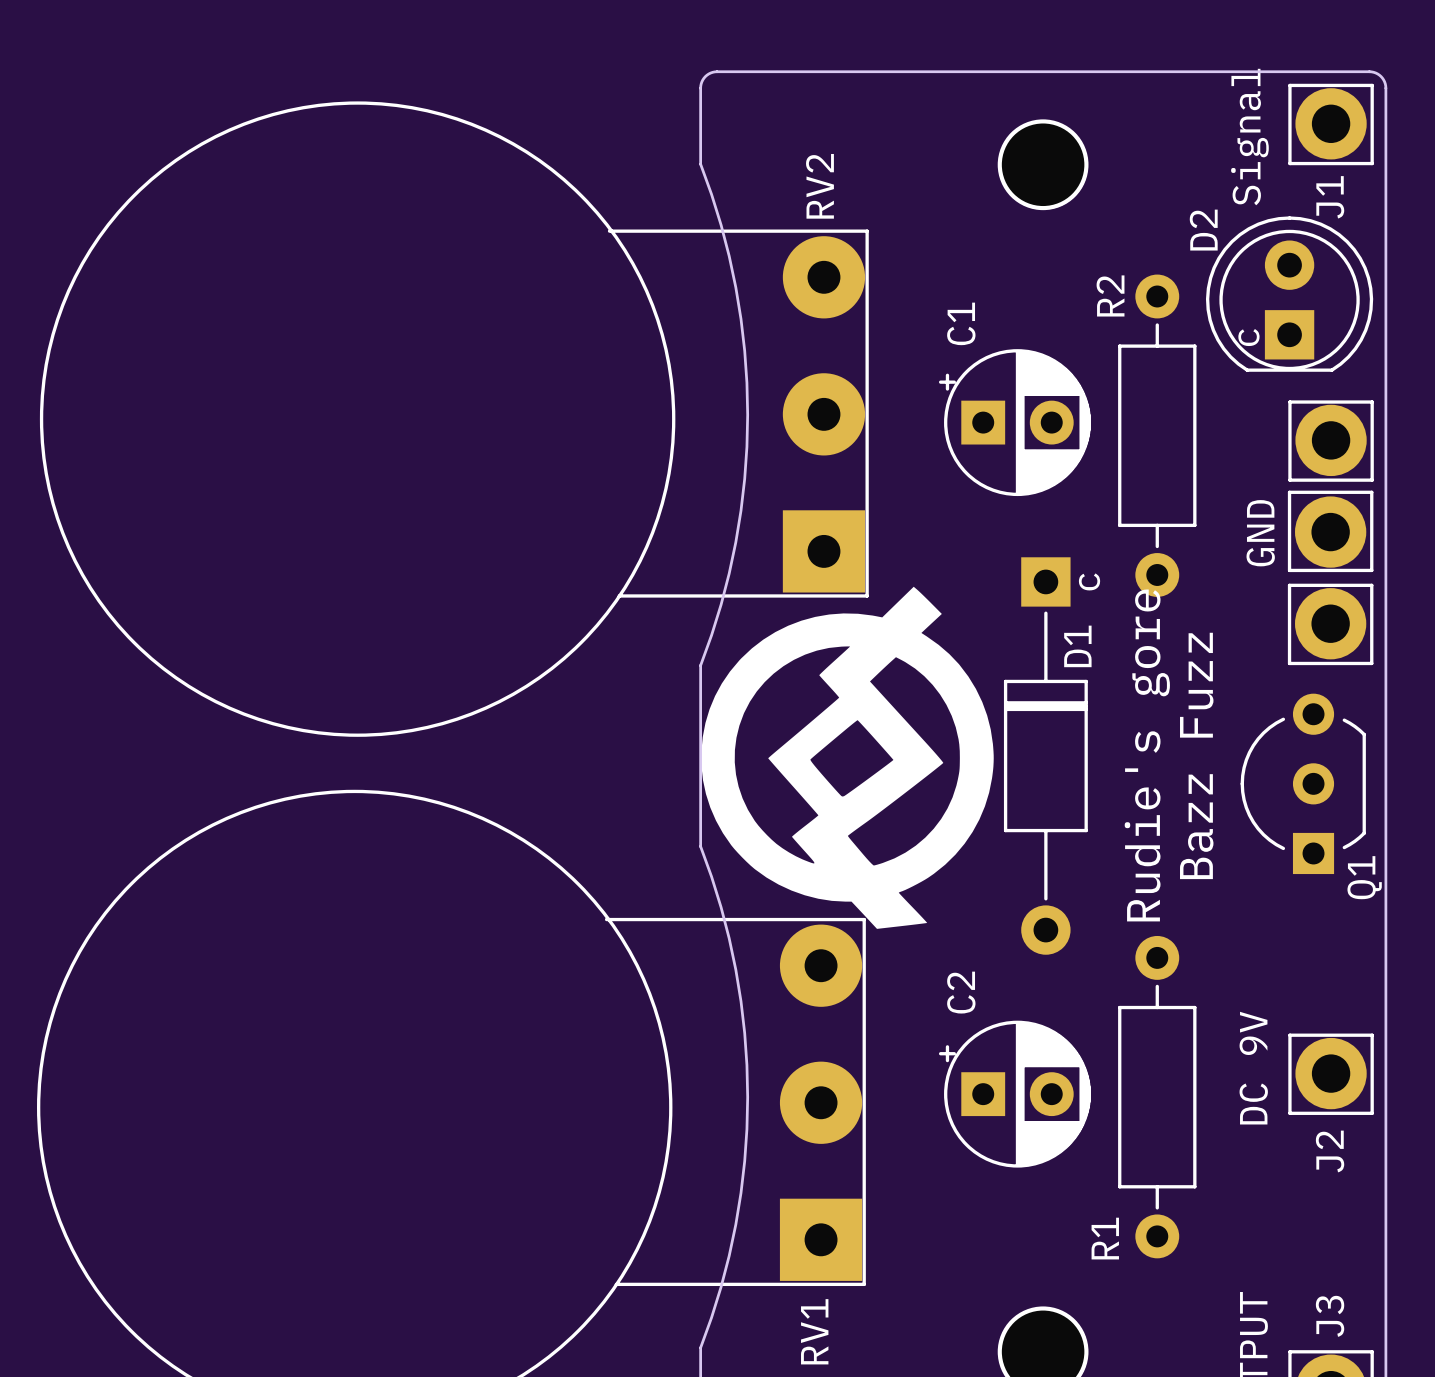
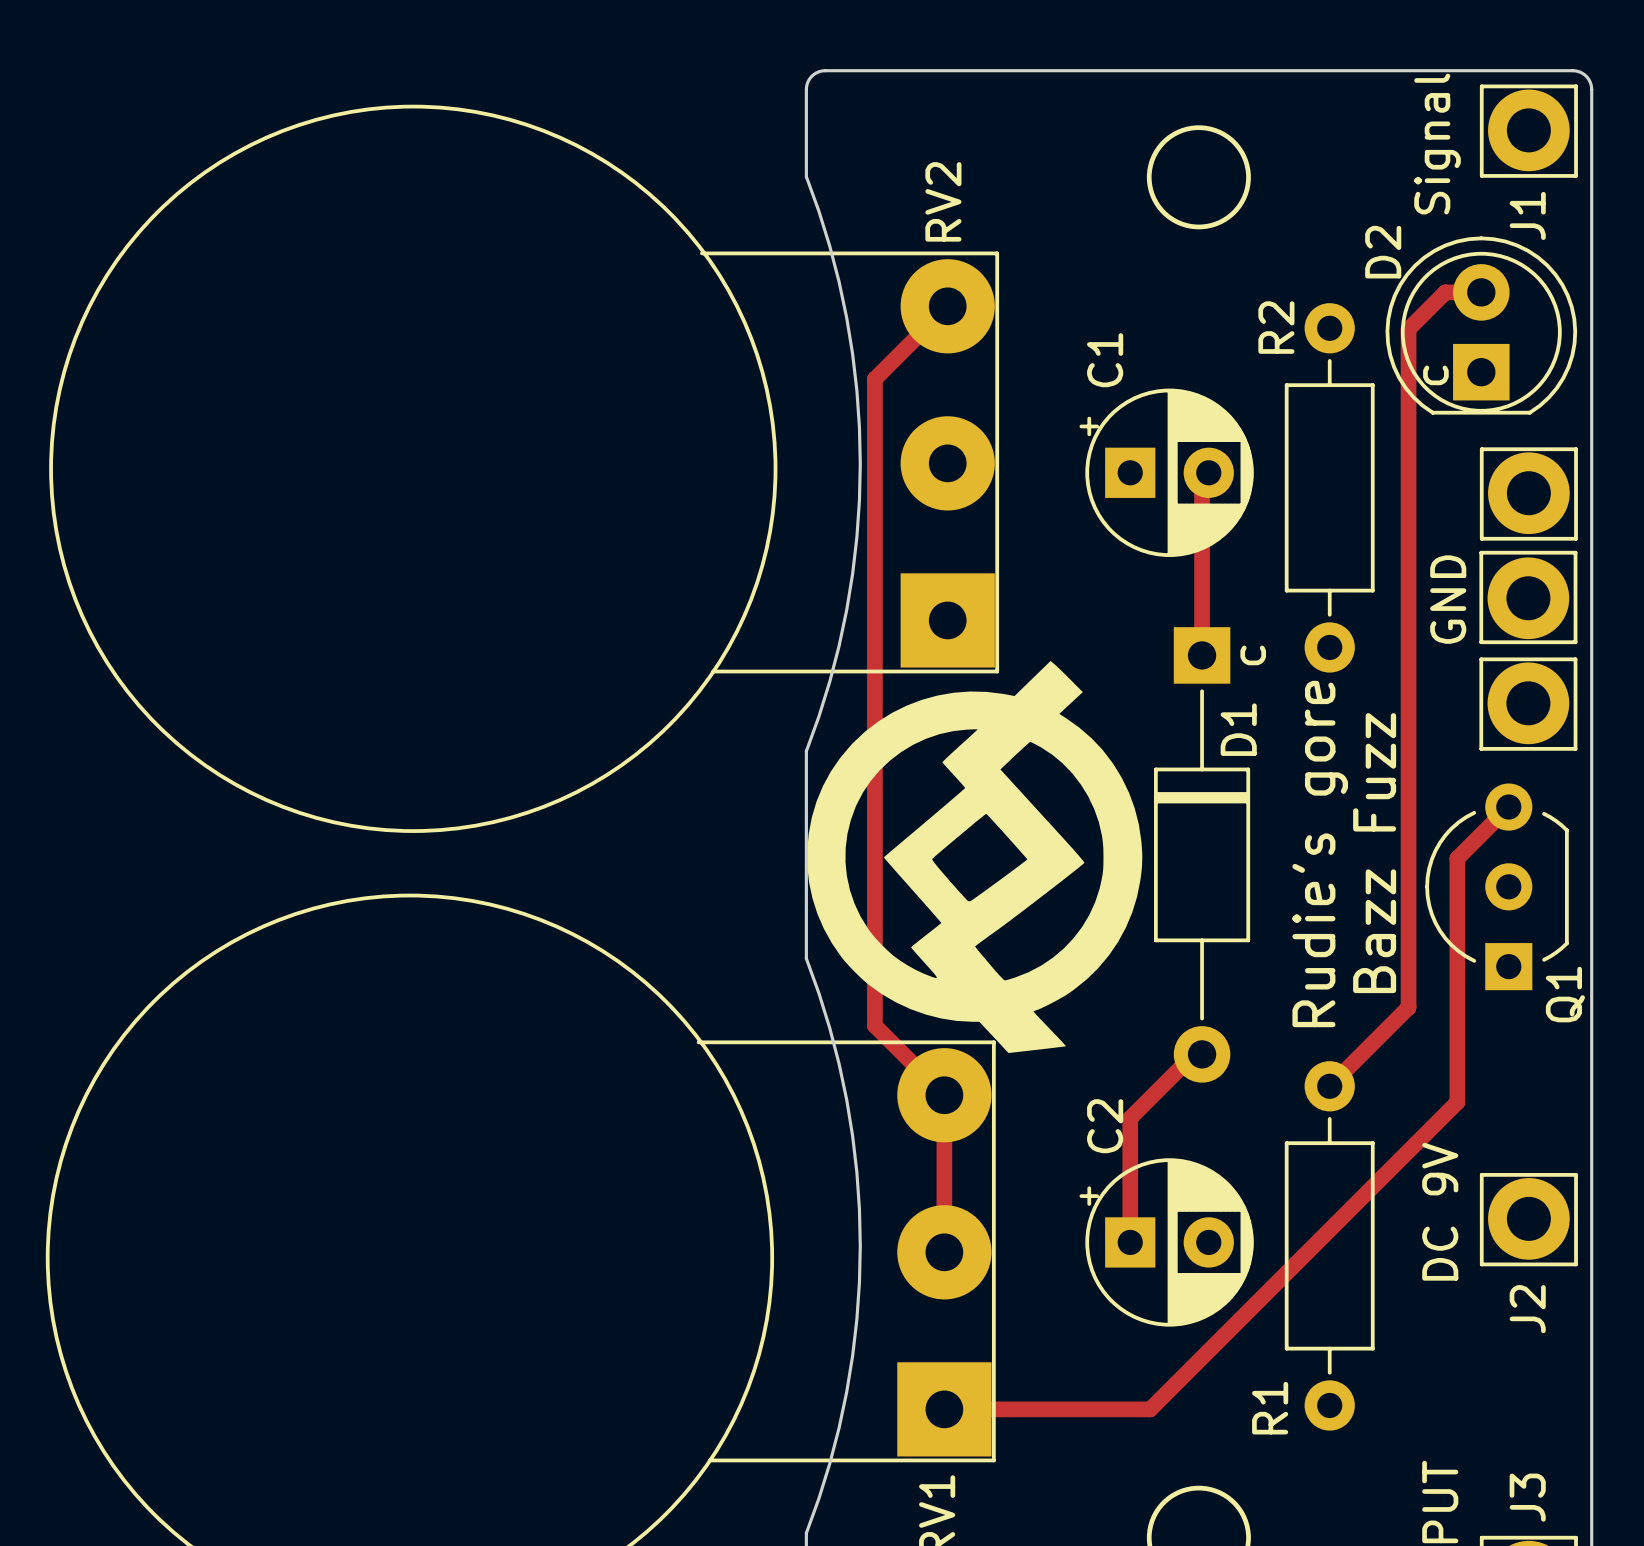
track: none -> (1481, 292) (1445, 292) (1408, 329) (1408, 1007) (1329, 1086)
track: none -> (947, 306) (874, 379) (874, 1025) (944, 1095) (944, 1252)
track: none -> (1208, 472) (1202, 479) (1202, 655)
track: none -> (1508, 807) (1457, 858) (1457, 1102) (1150, 1409) (944, 1409)
track: none -> (1202, 1054) (1194, 1054) (1130, 1118) (1130, 1242)

